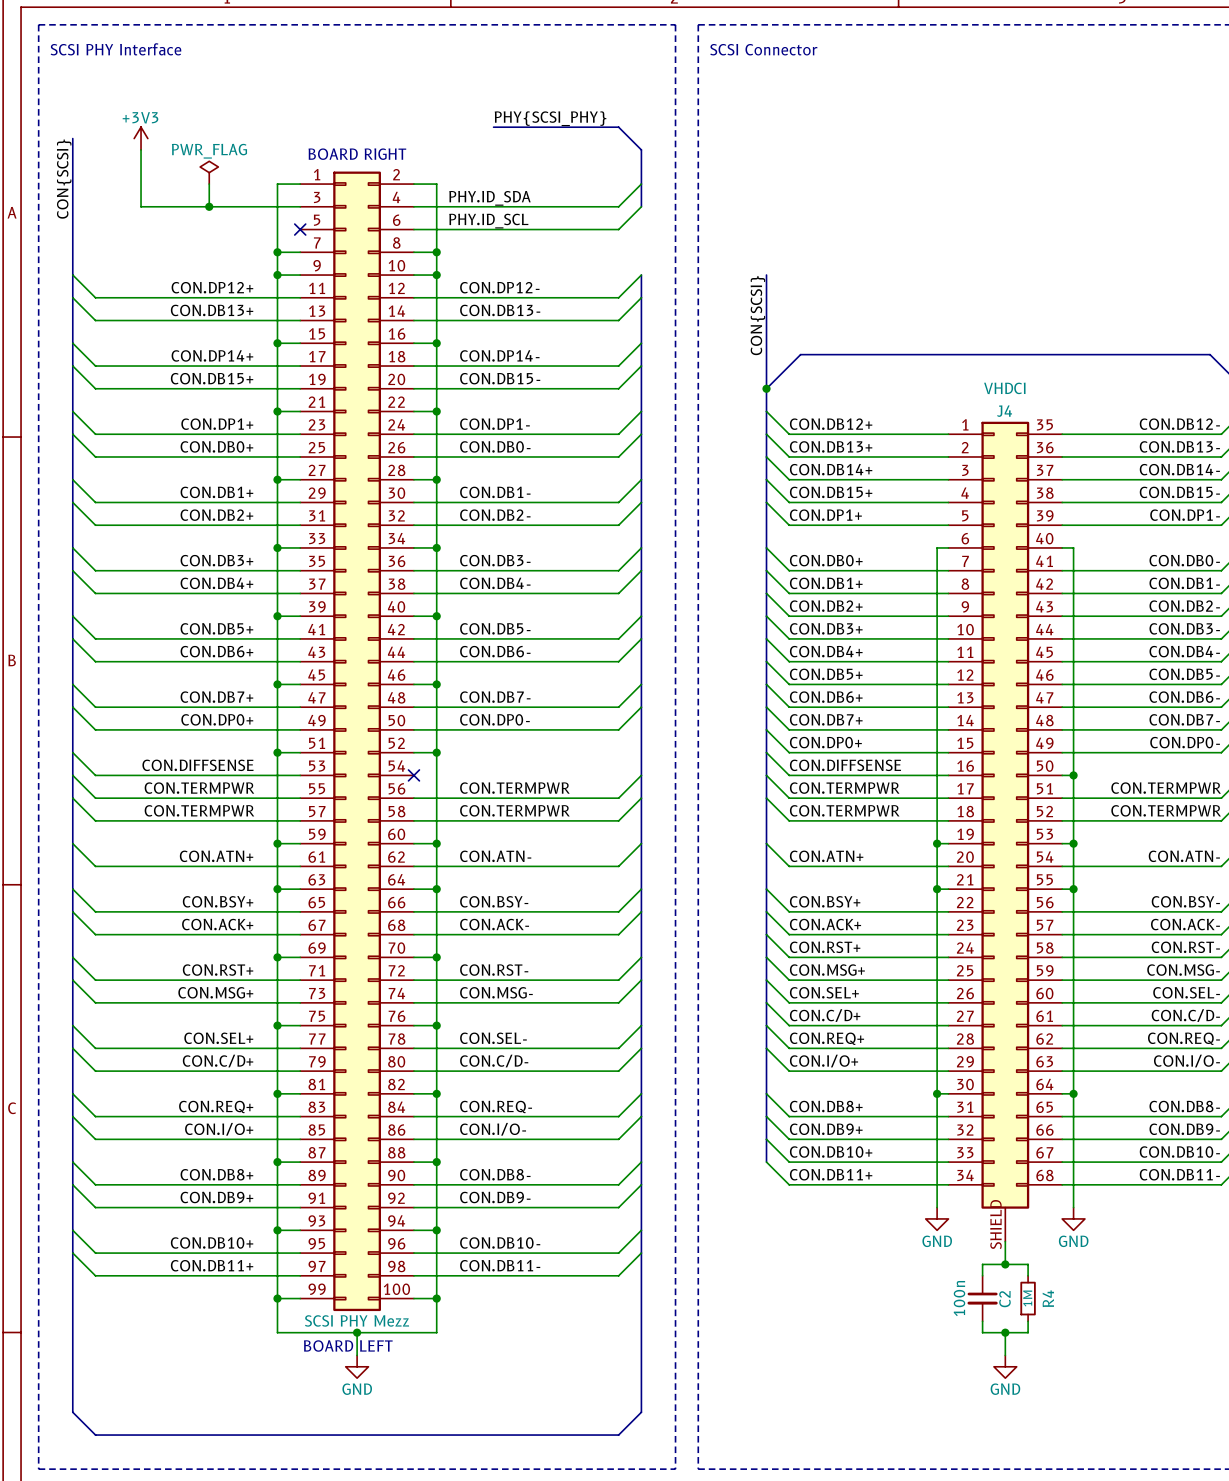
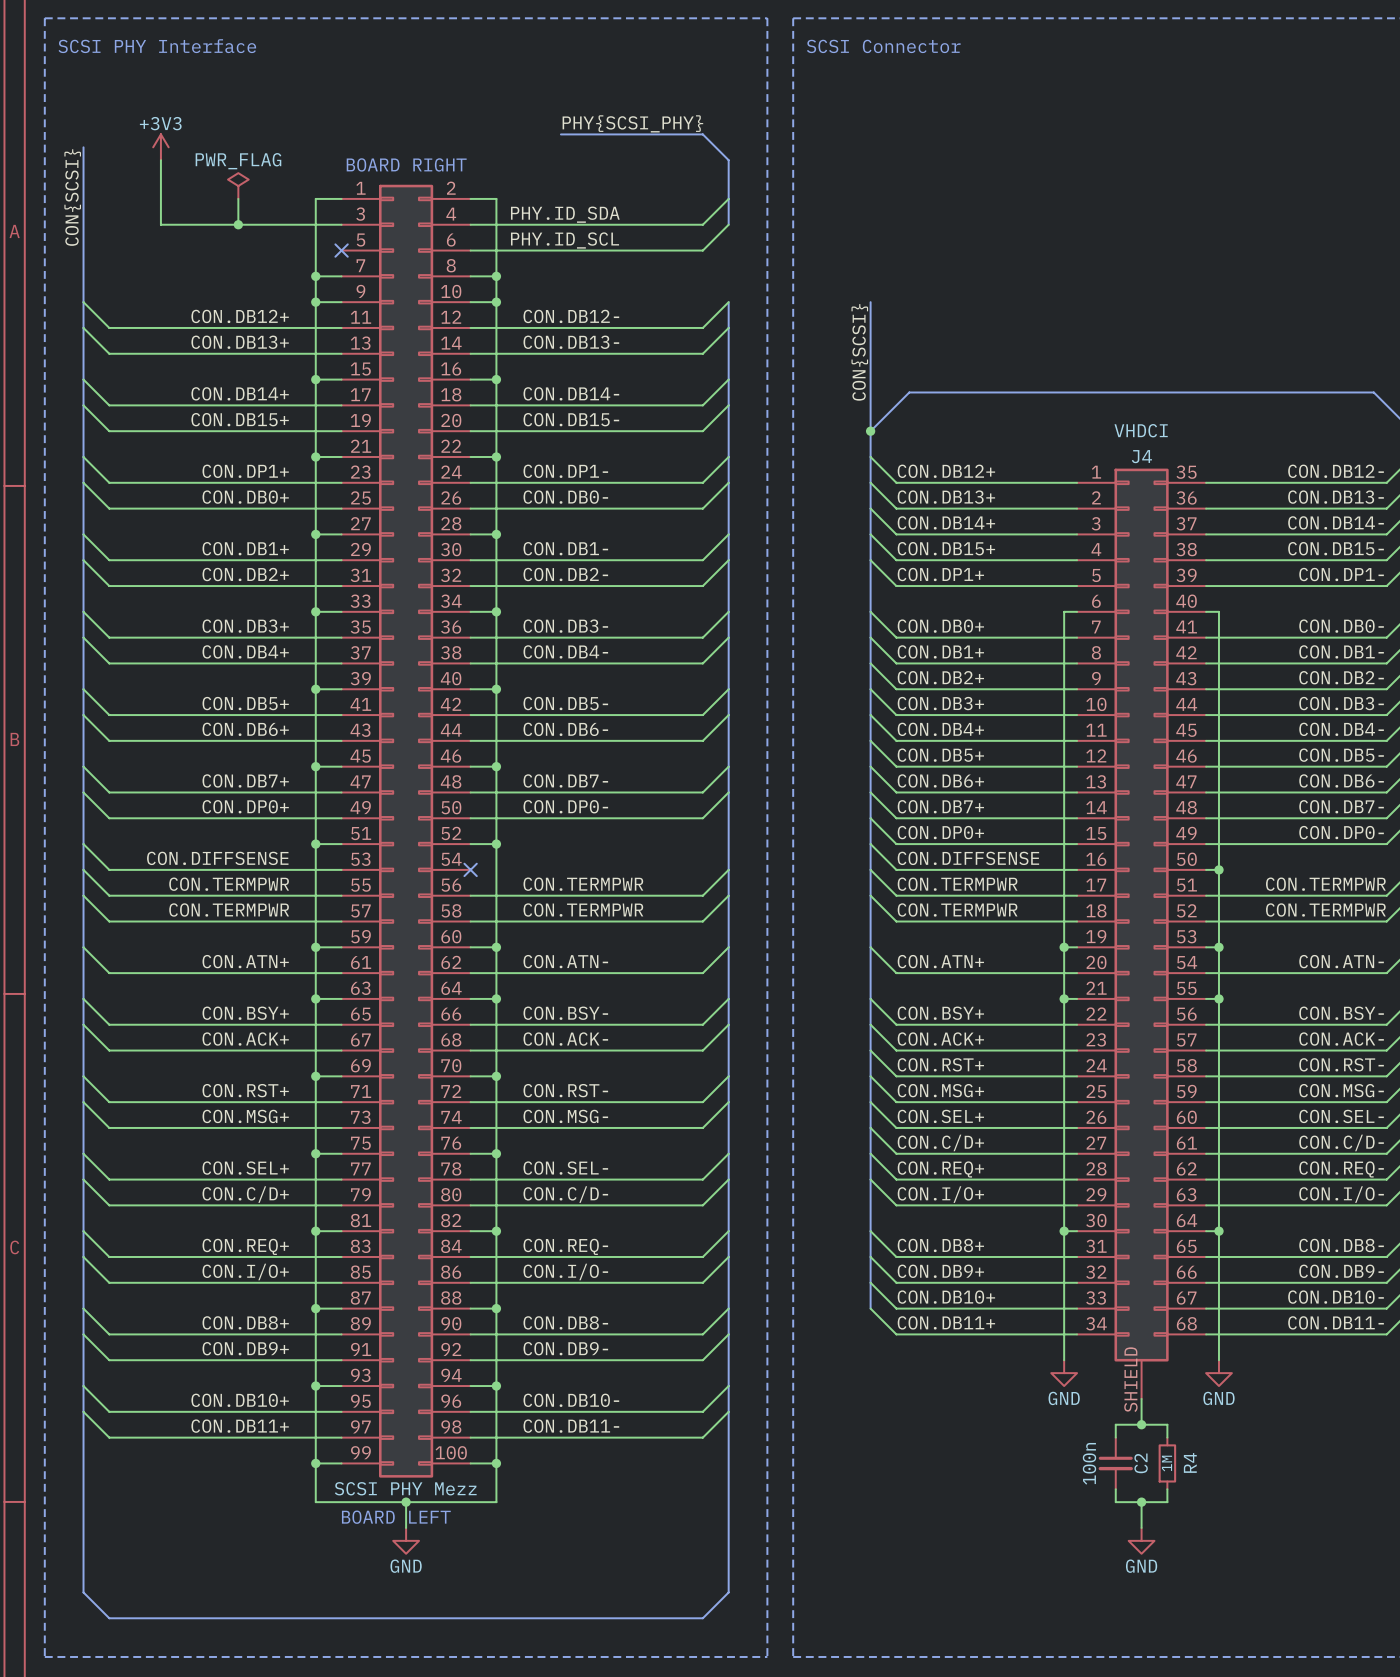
label: CON.DP12+ (212, 287) -> CON.DB12+ (240, 316)
label: CON.DP12- (499, 287) -> CON.DB12- (571, 316)
label: CON.DP14+ (212, 355) -> CON.DB14+ (240, 393)
label: CON.DP14- (499, 355) -> CON.DB14- (571, 393)

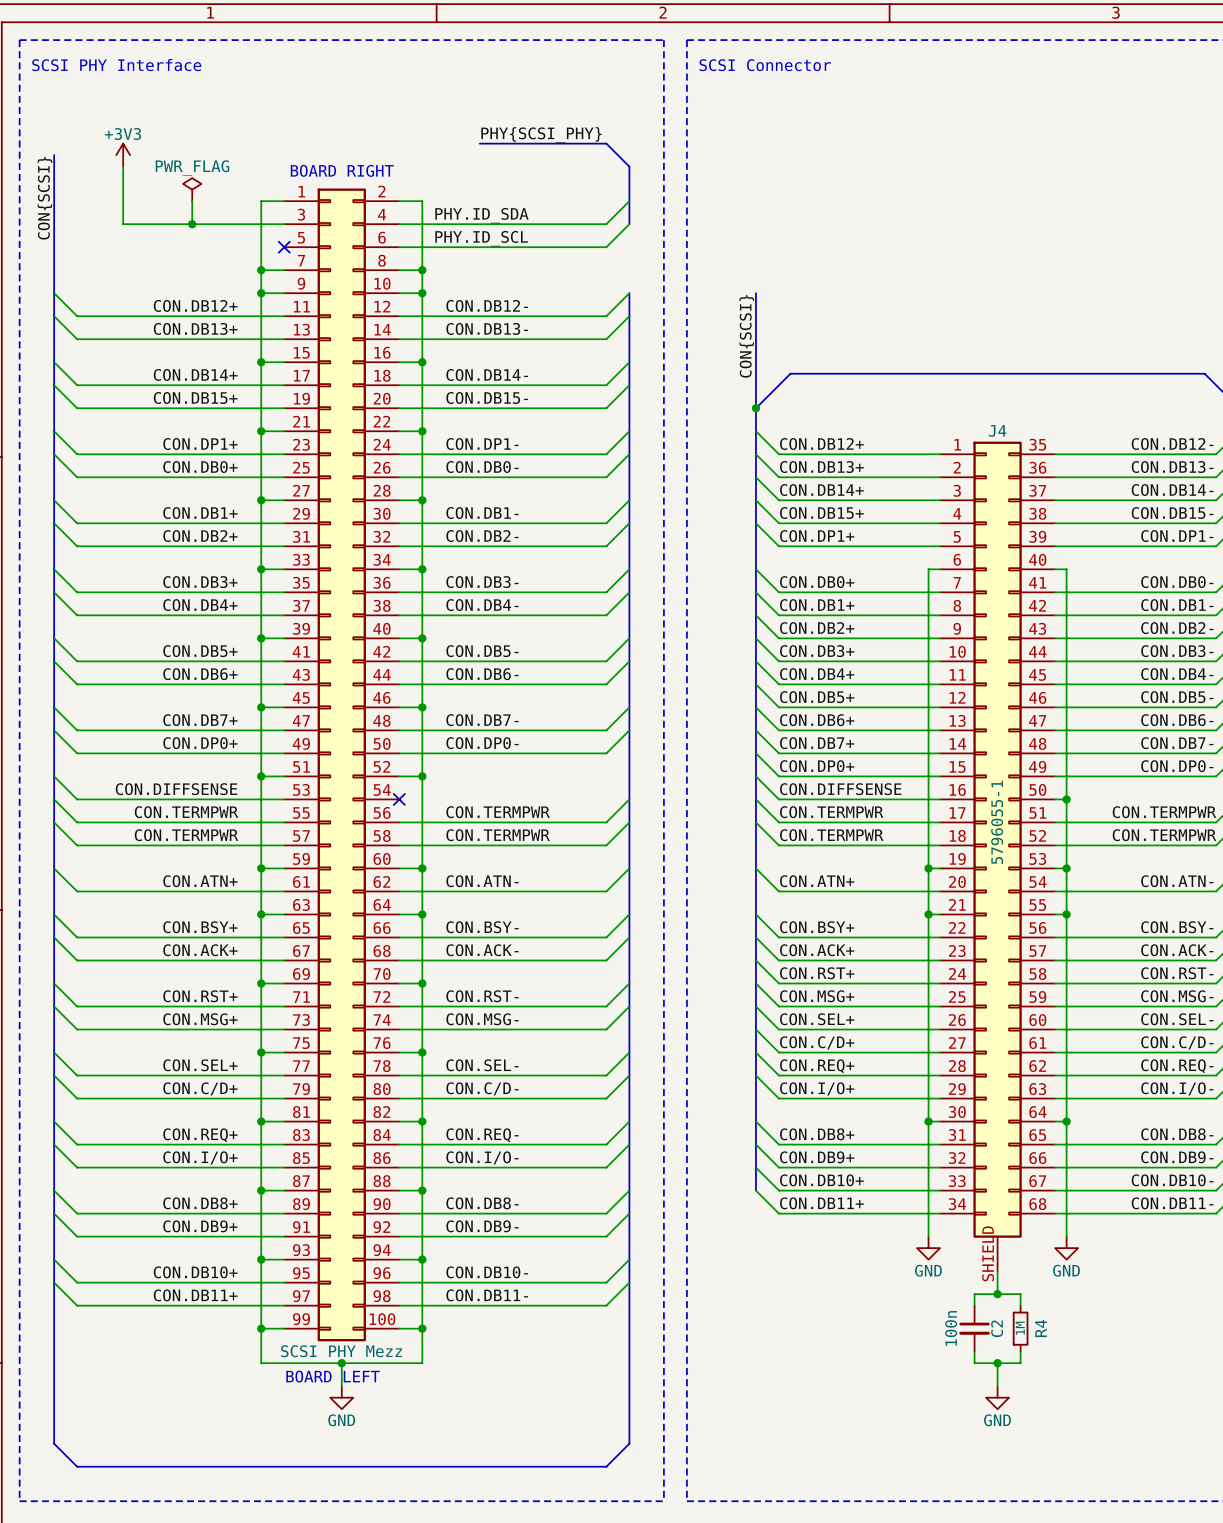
J4 value: VHDCI (1141, 430) -> 5796055-1 (997, 822)

